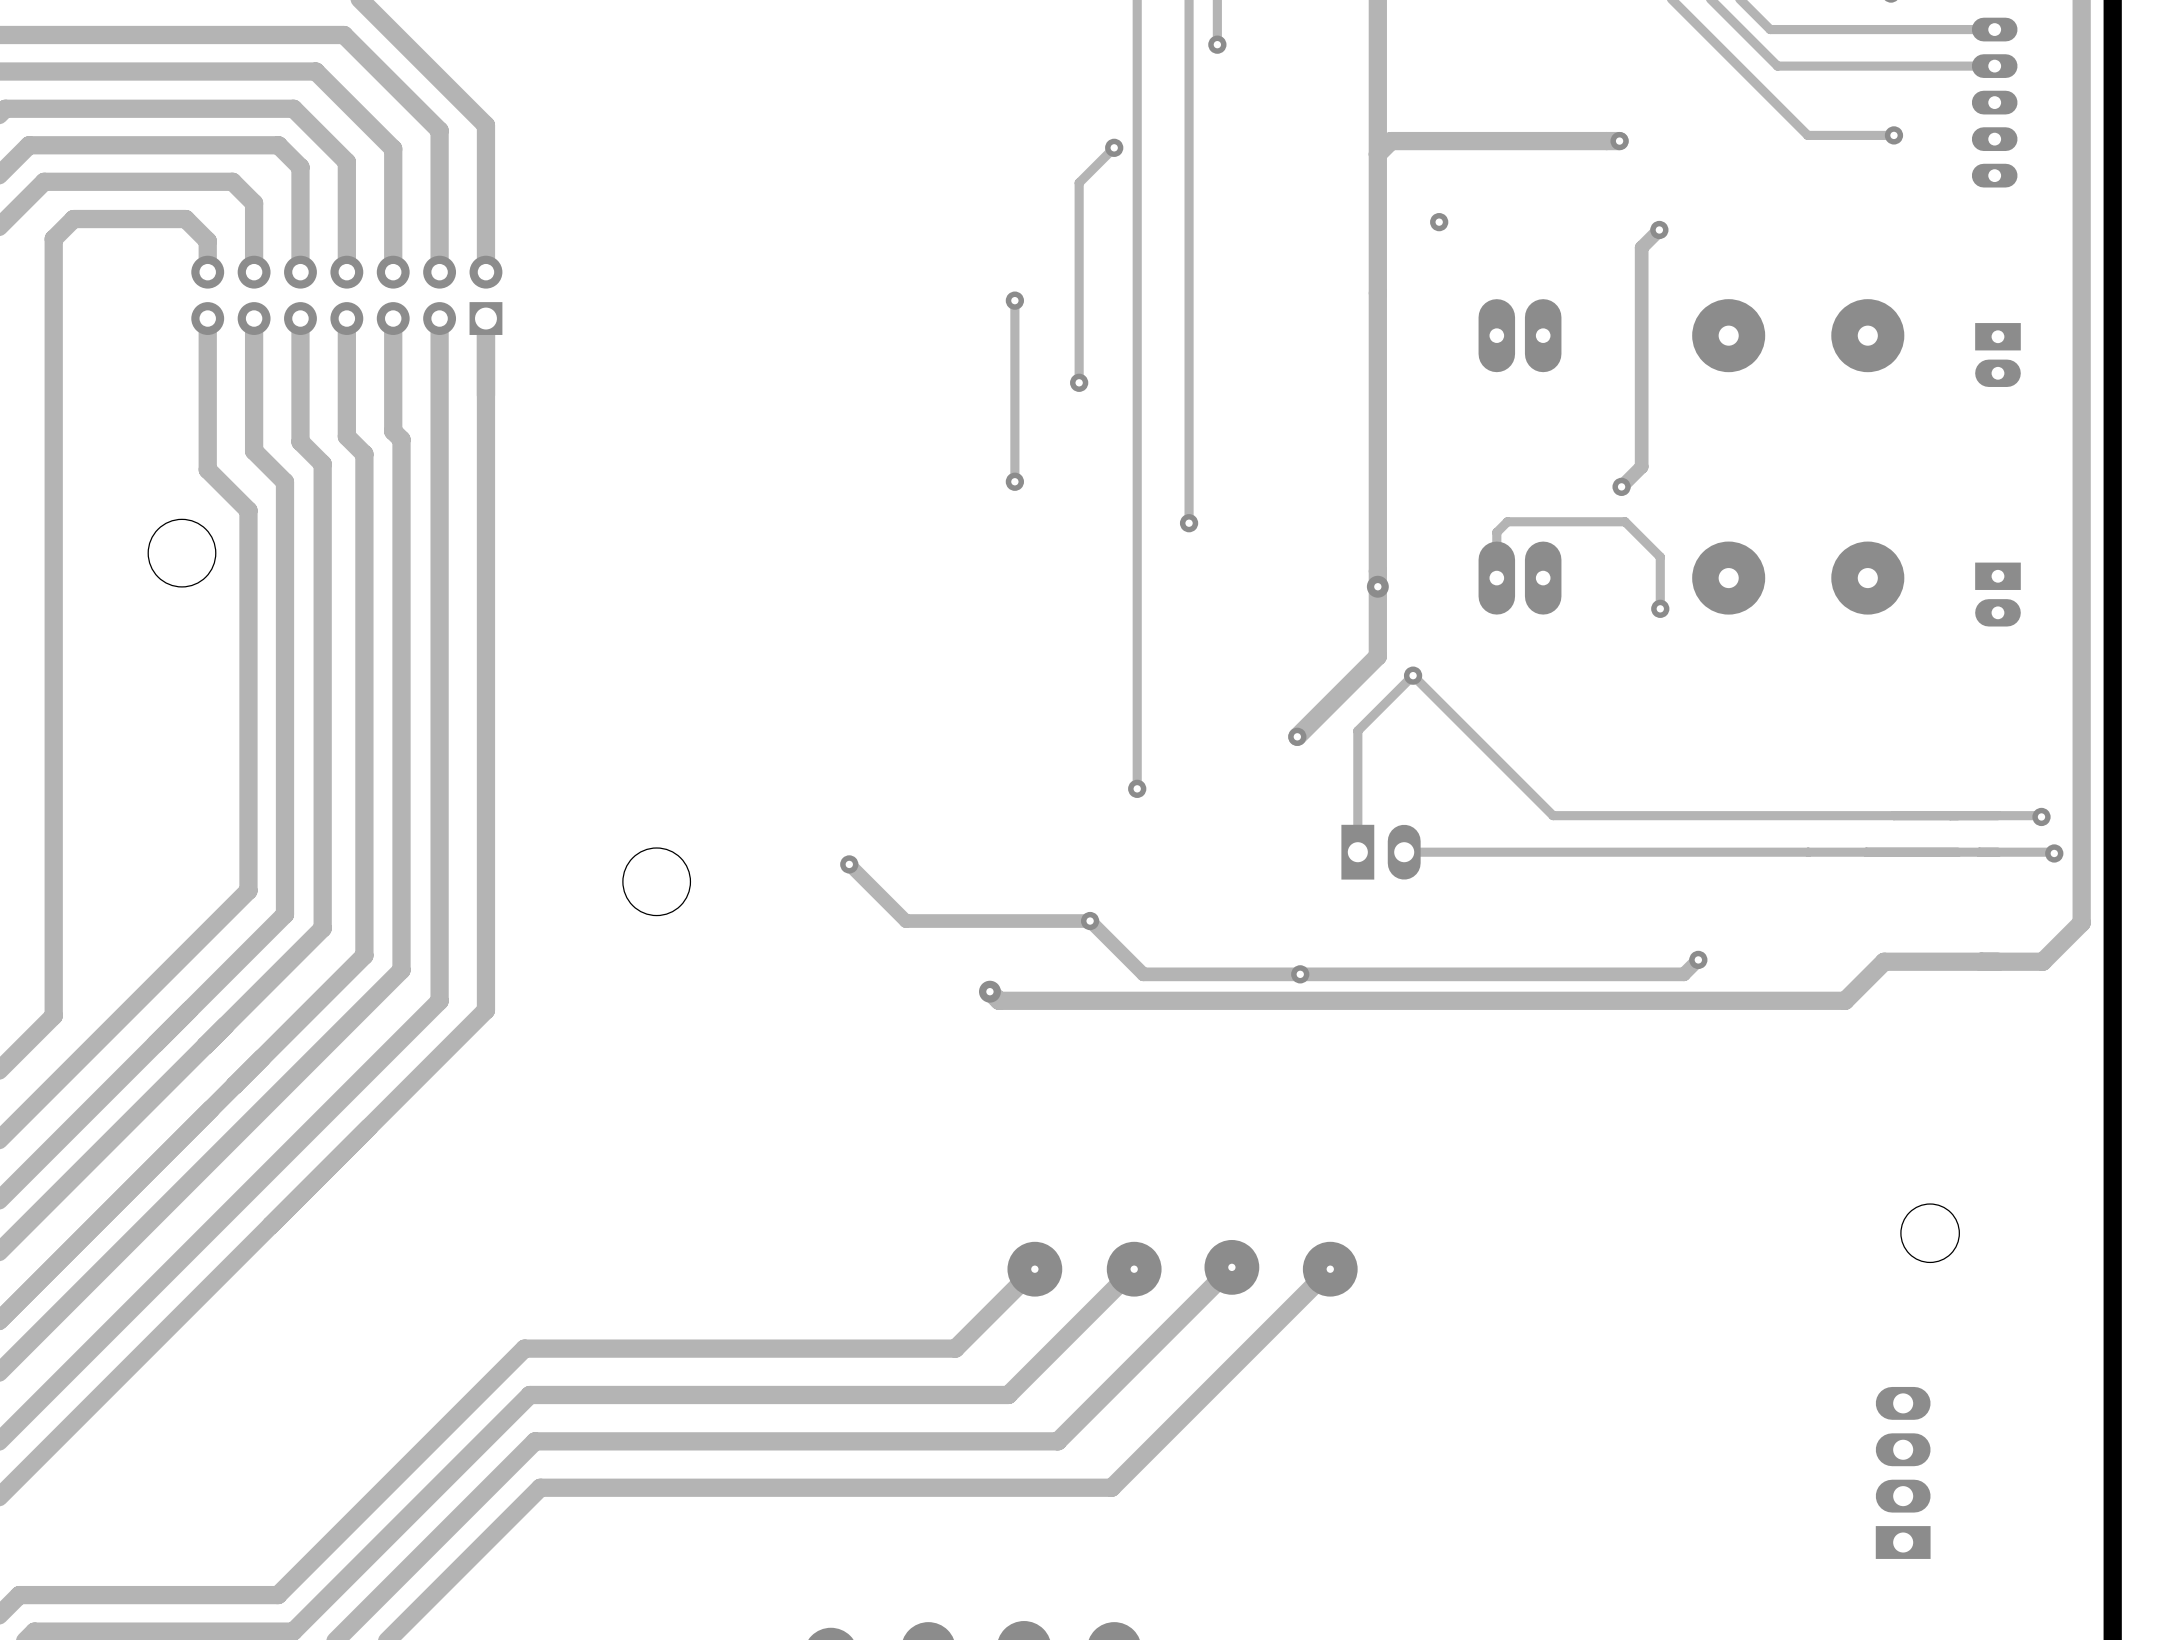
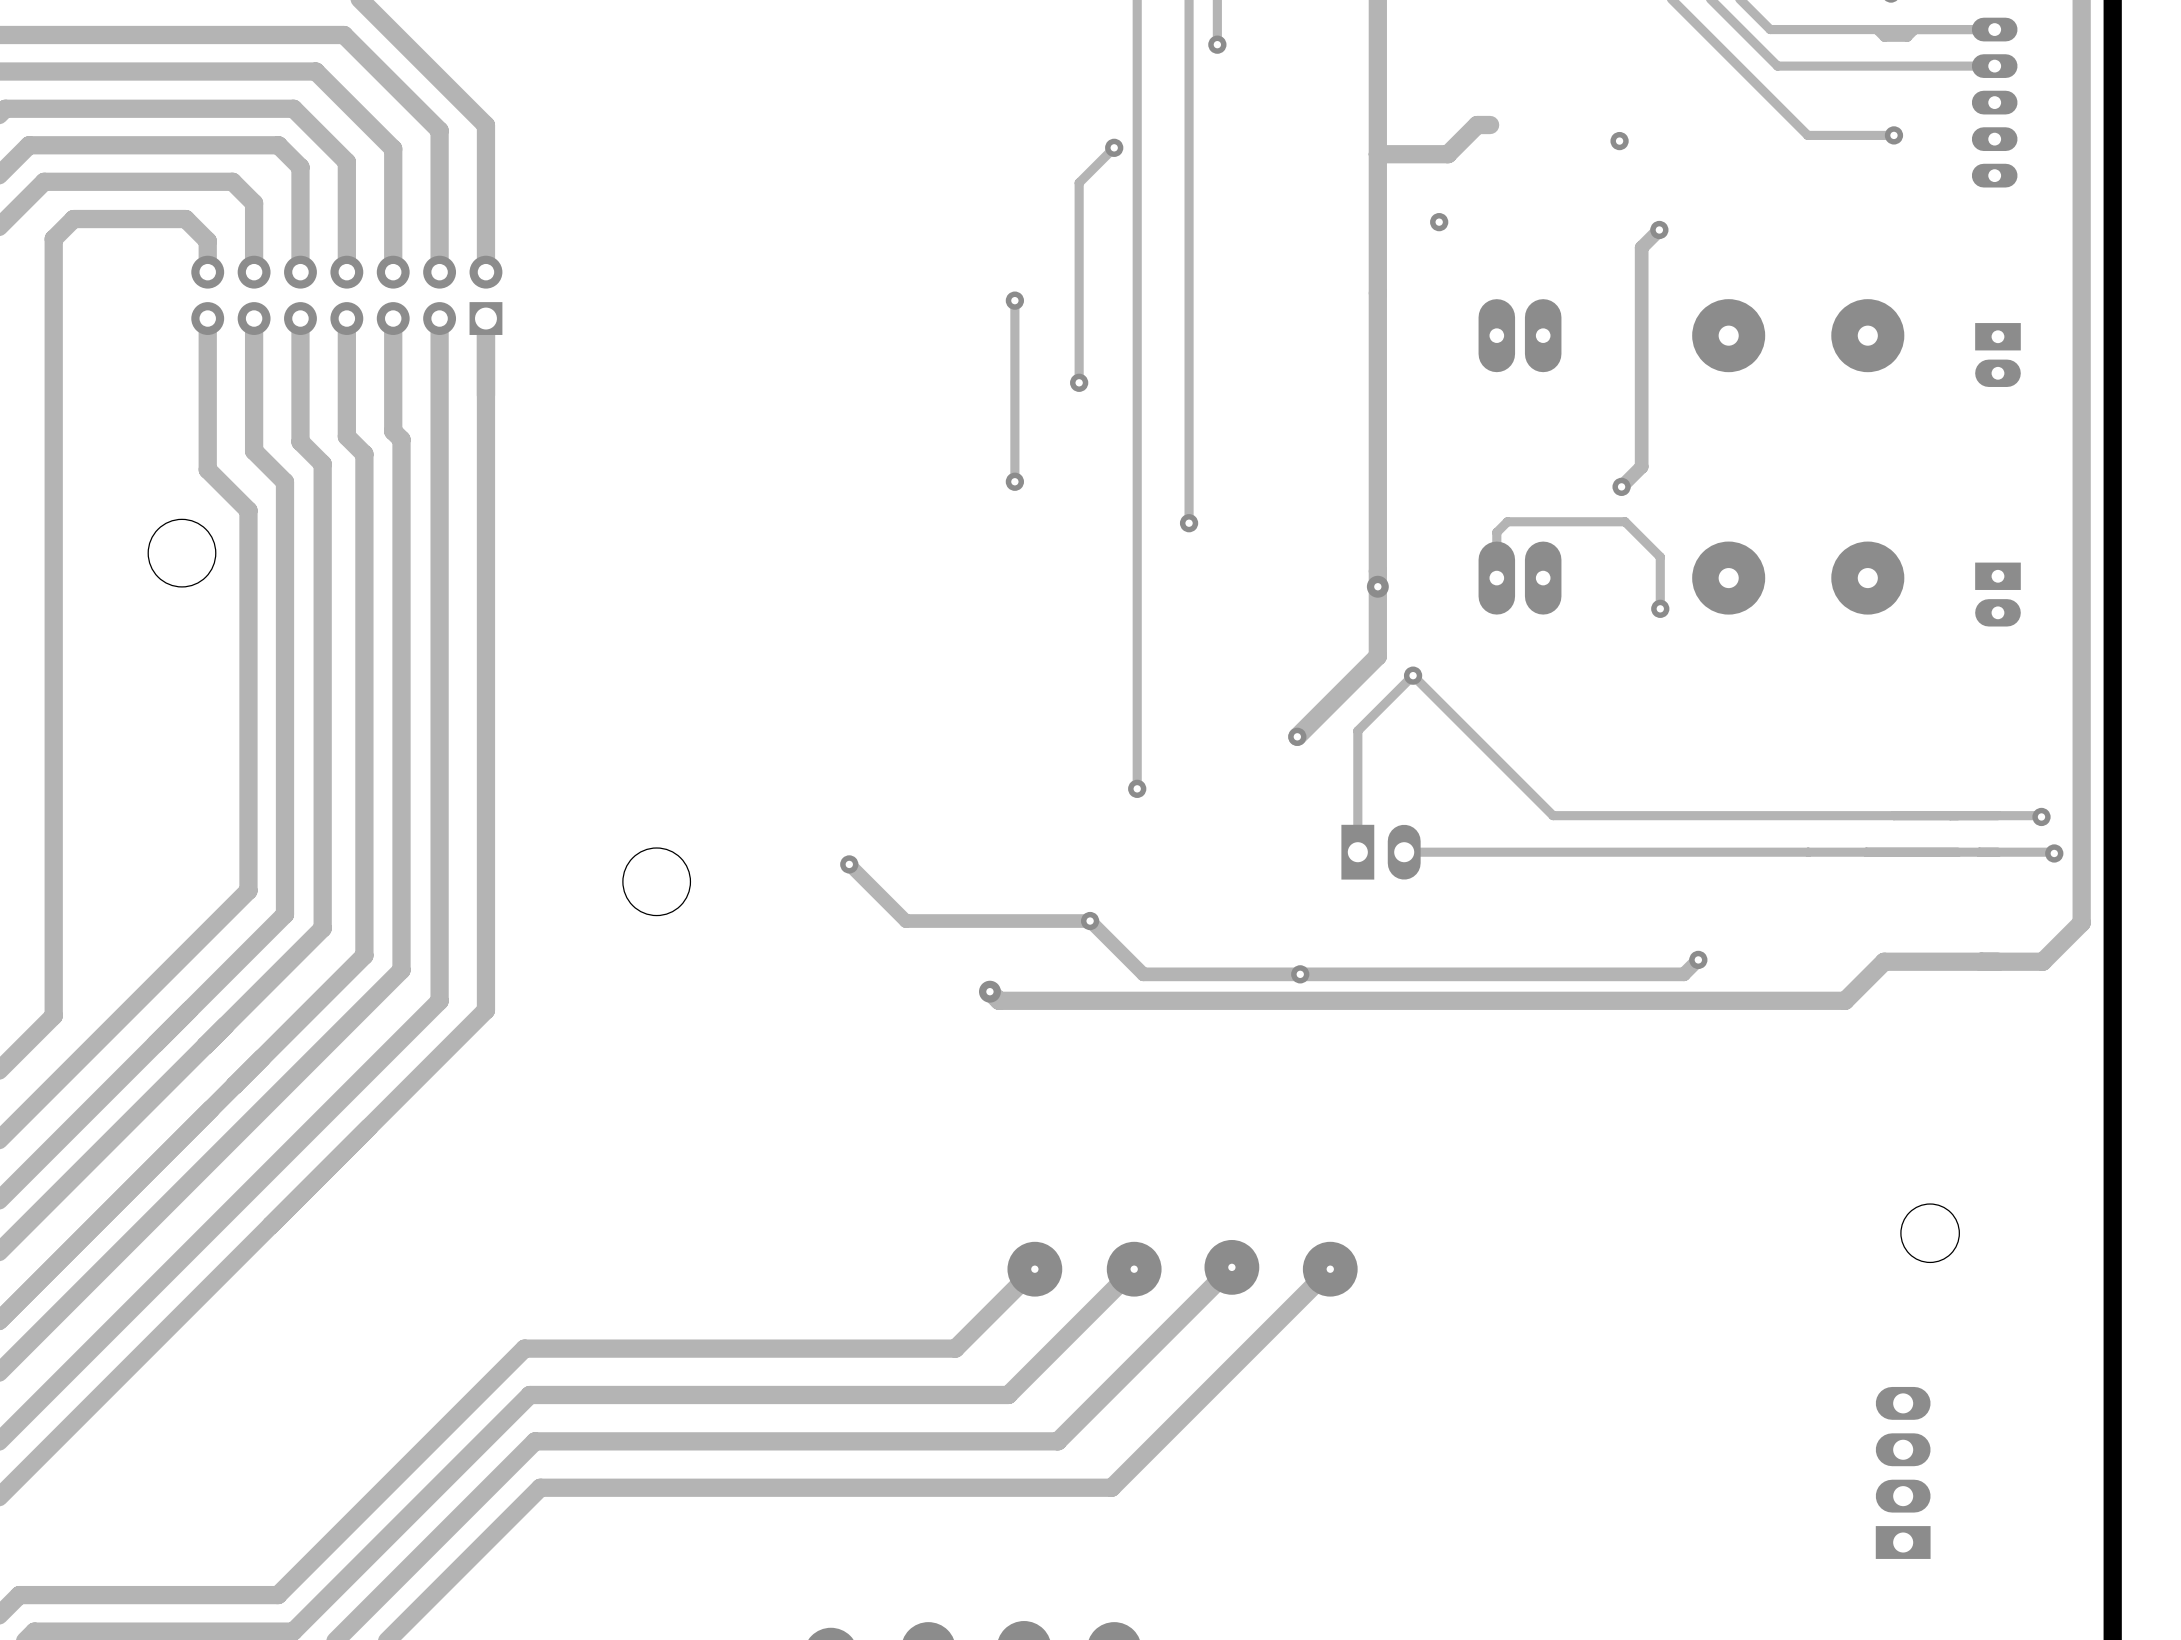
track: none -> (1915, 29) (1907, 37) (1884, 37) (1876, 29)
track: (1619, 141) (1390, 141) (1377, 154) -> (1490, 125) (1477, 125) (1448, 154) (1377, 154)

